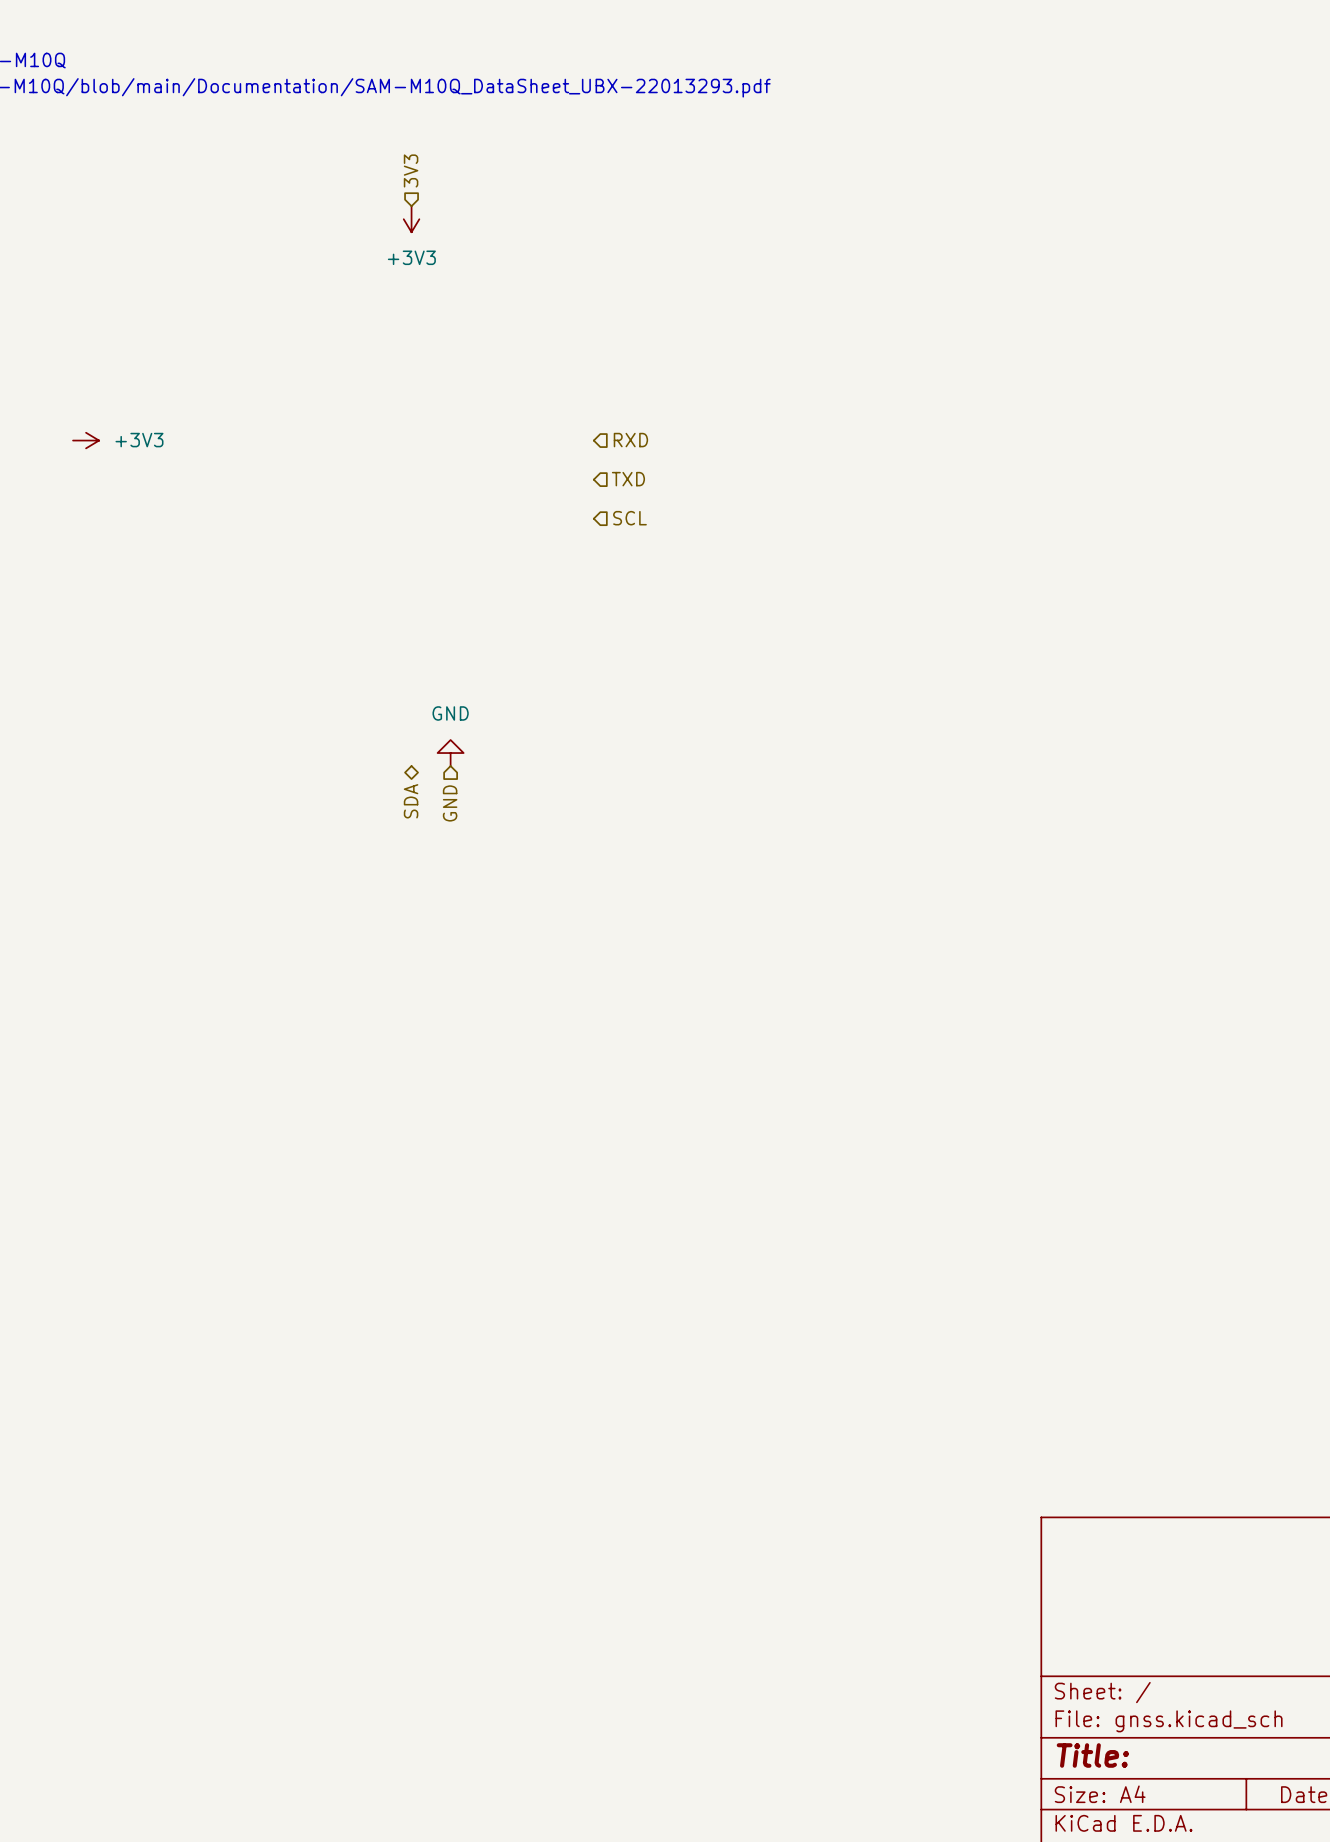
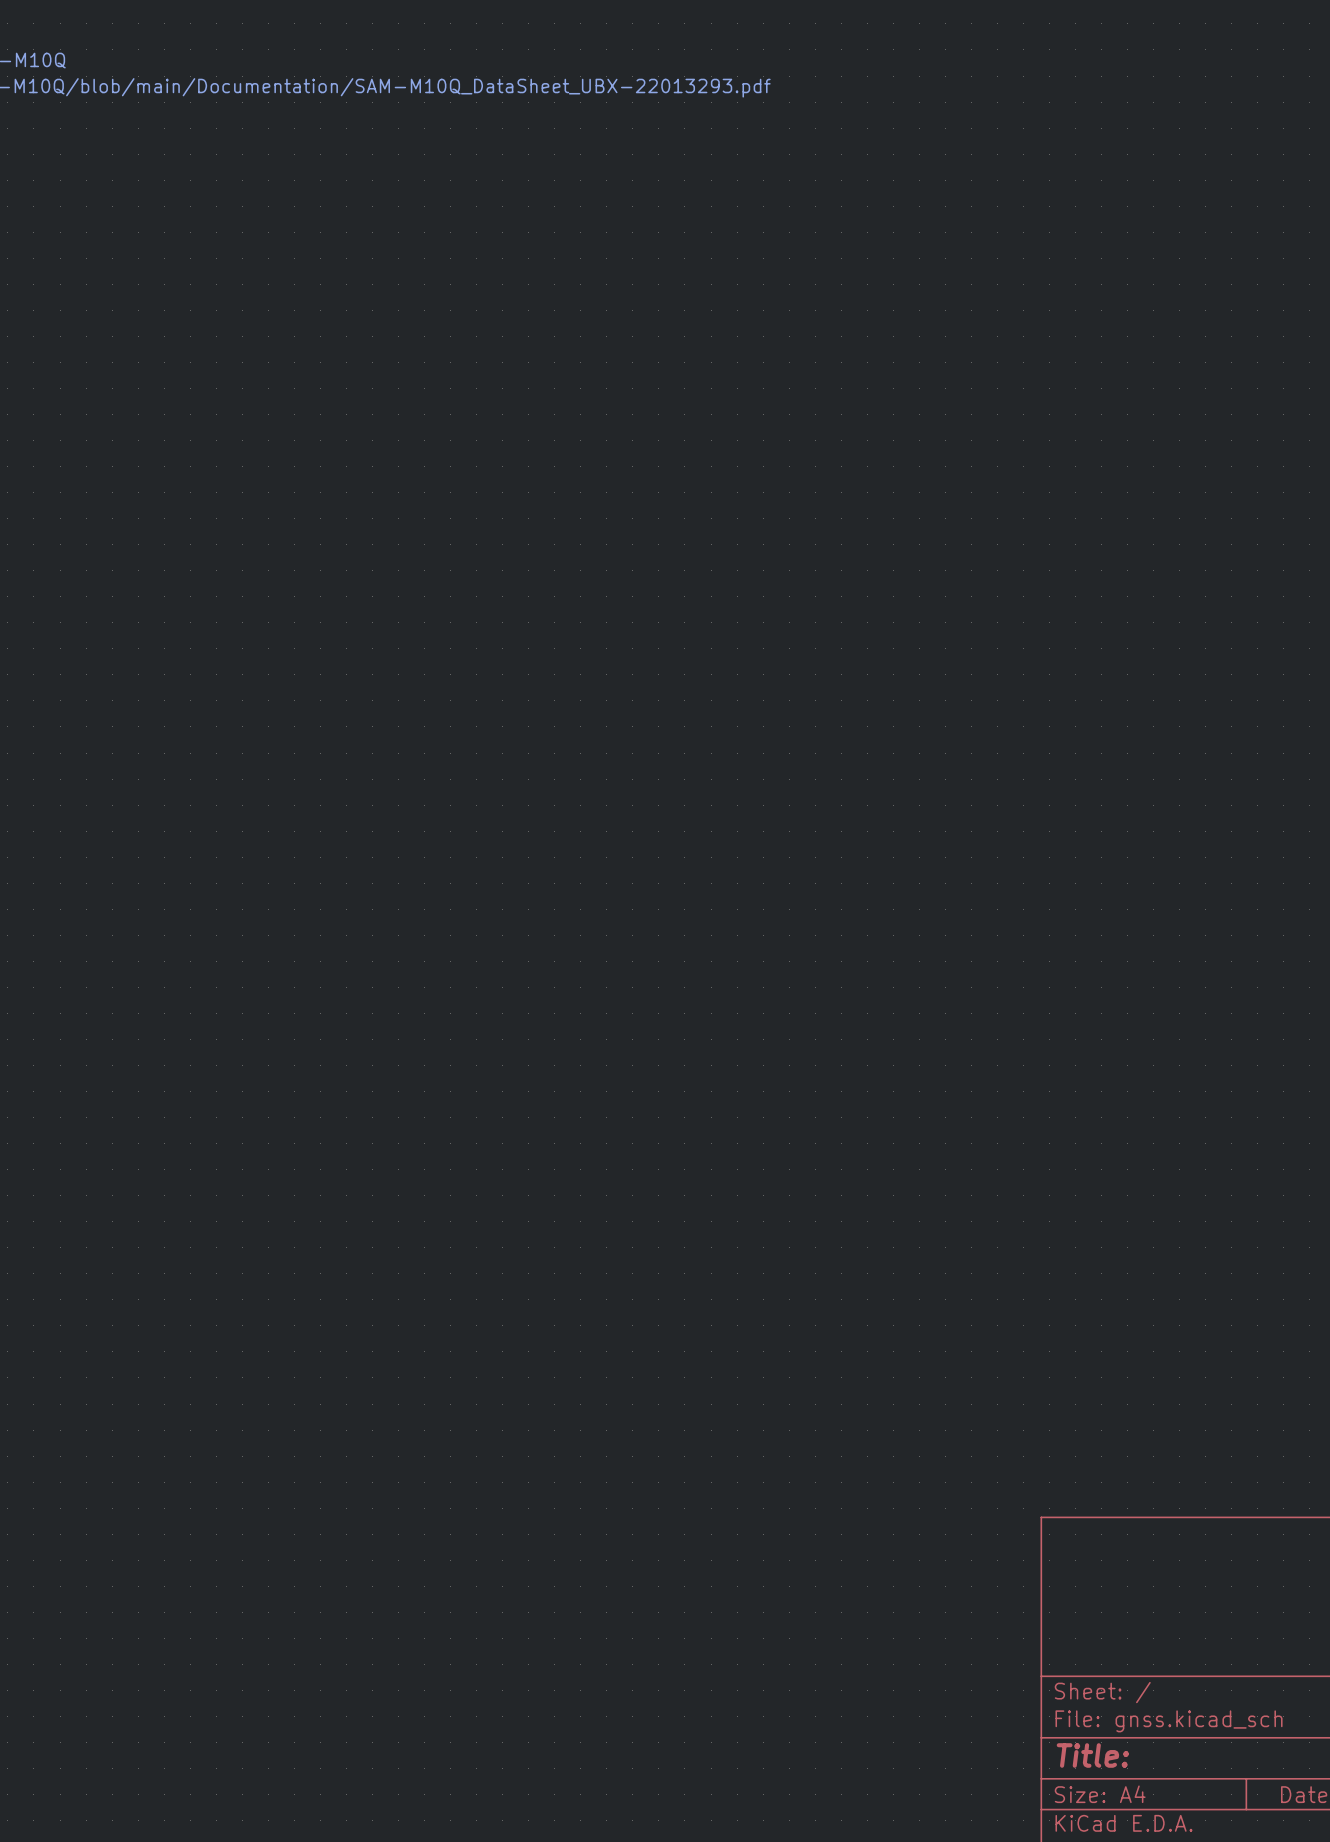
hierarchical label: 3V3 (411, 170) -> none
power symbol: +3V3 (411, 219) -> none
power symbol: +3V3 (86, 440) -> none
hierarchical label: RXD (630, 440) -> none
hierarchical label: TXD (628, 479) -> none
hierarchical label: SCL (629, 518) -> none
power symbol: GND (450, 753) -> none
hierarchical label: SDA (411, 801) -> none
hierarchical label: GND (450, 803) -> none

